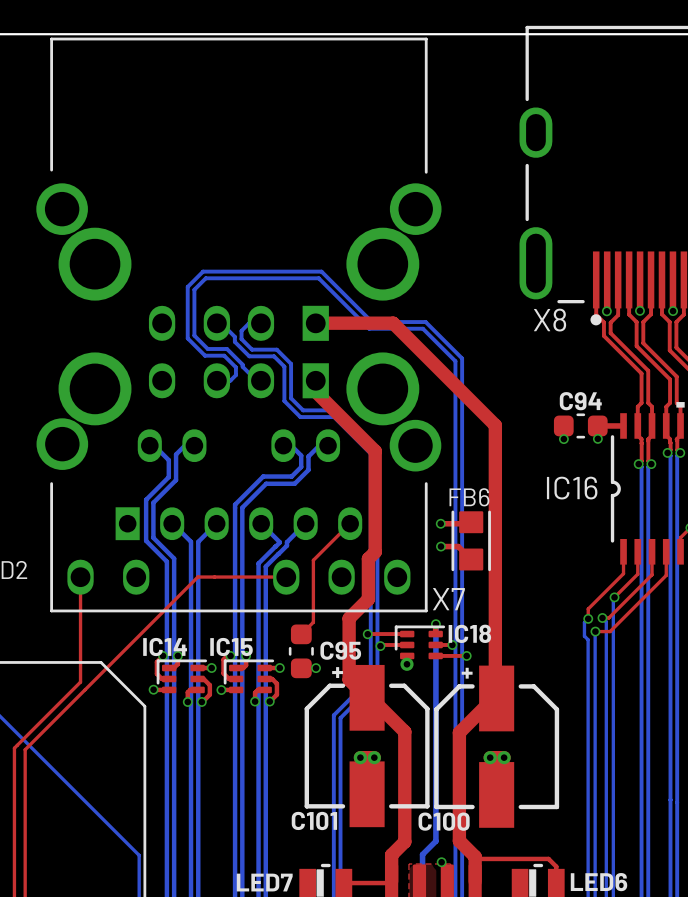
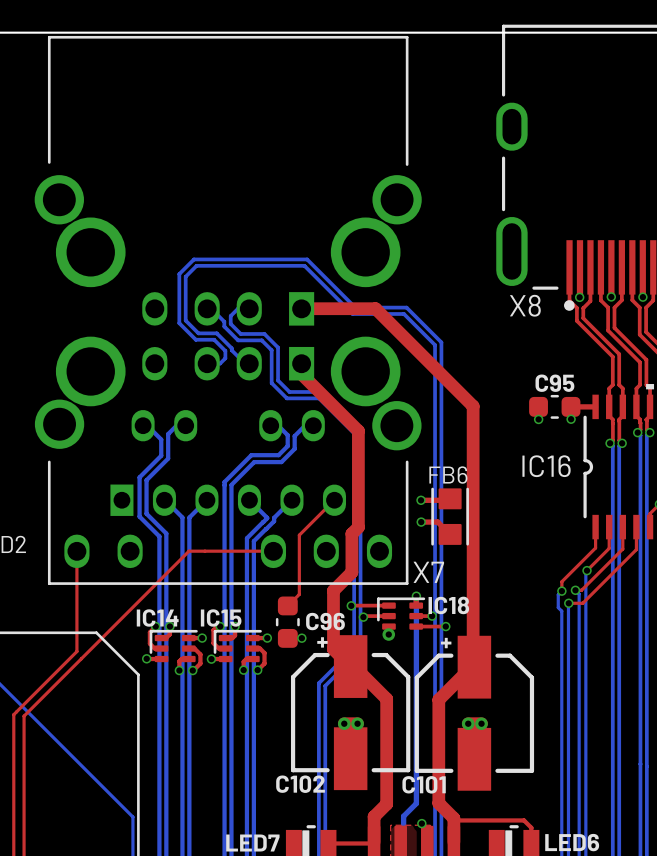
C94 name: C94 (580, 401) -> C95 (554, 383)
C95 name: C95 (340, 650) -> C96 (325, 621)
C101 name: C101 (314, 820) -> C102 (300, 784)
C100 name: C100 (444, 821) -> C101 (424, 784)

